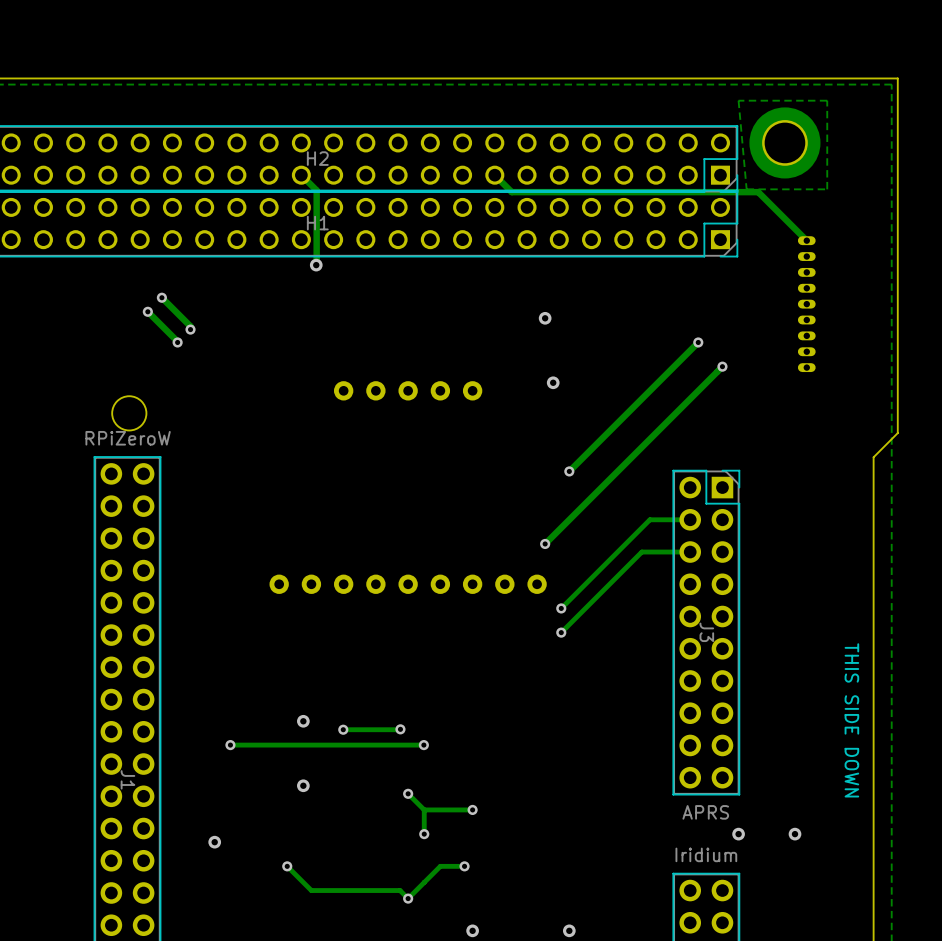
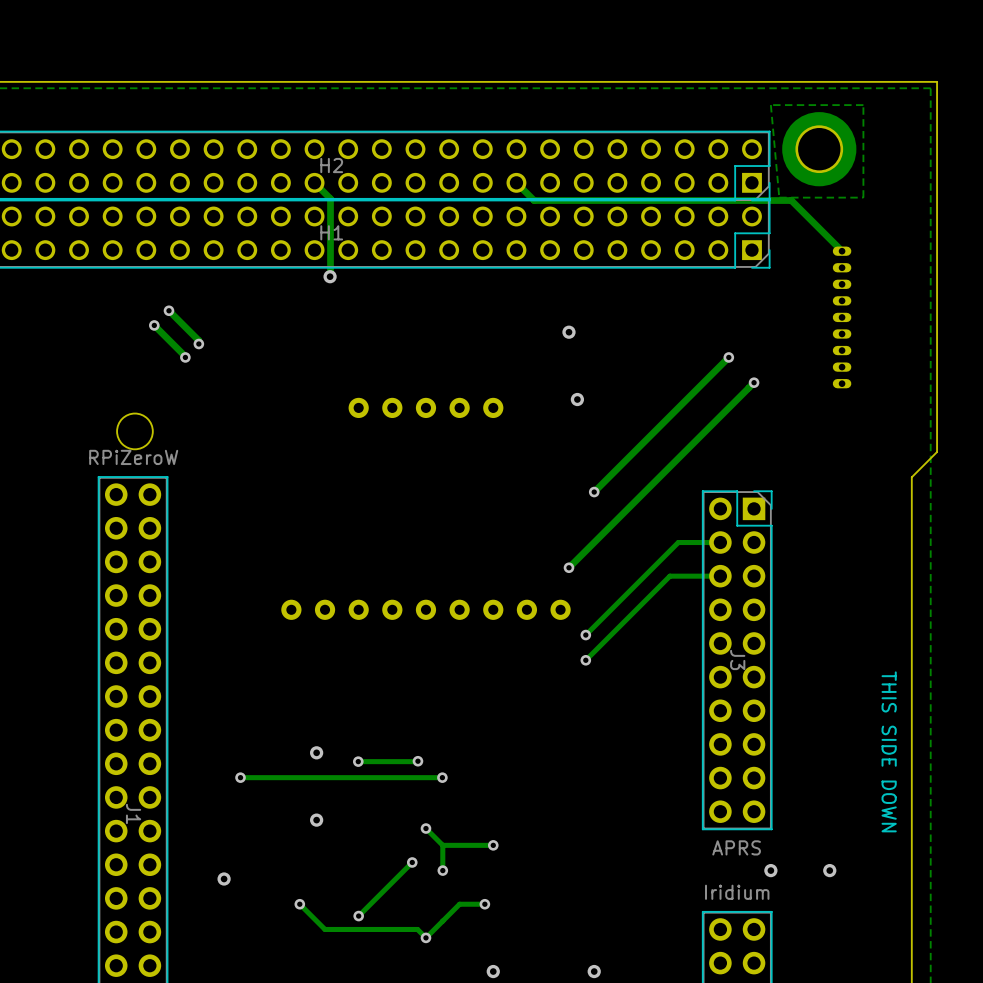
track: none -> (412, 862) (358, 916)
via: none -> (412, 862)
via: none -> (358, 916)

